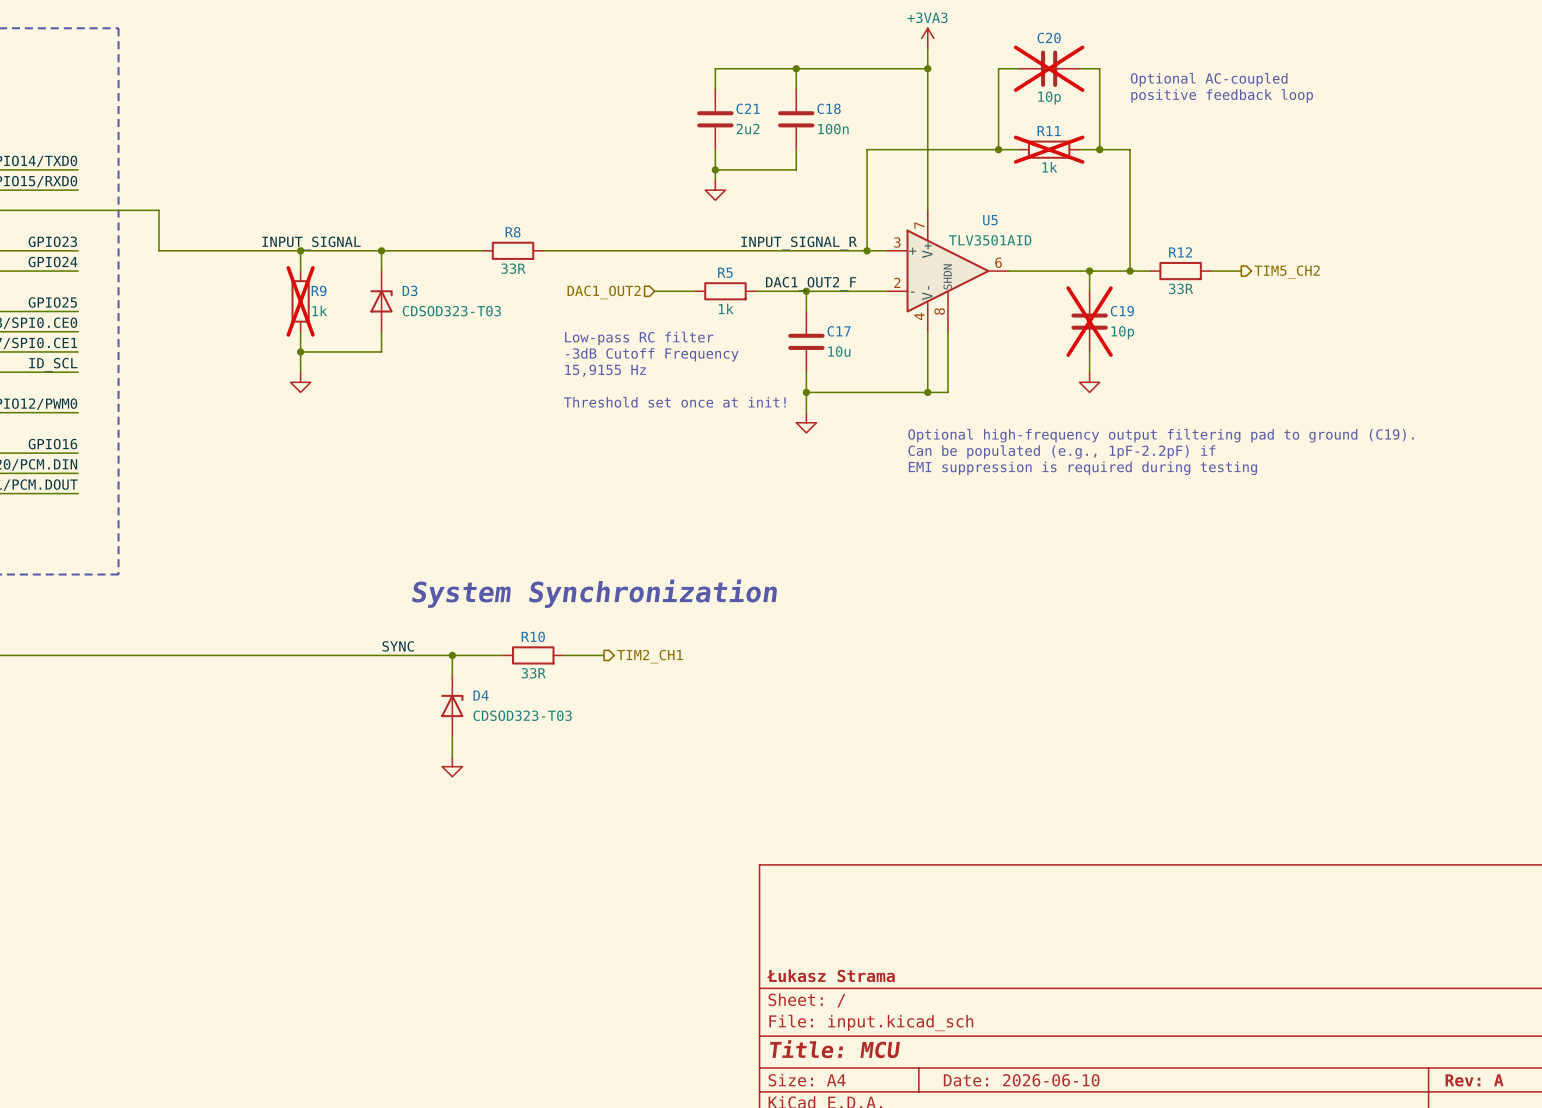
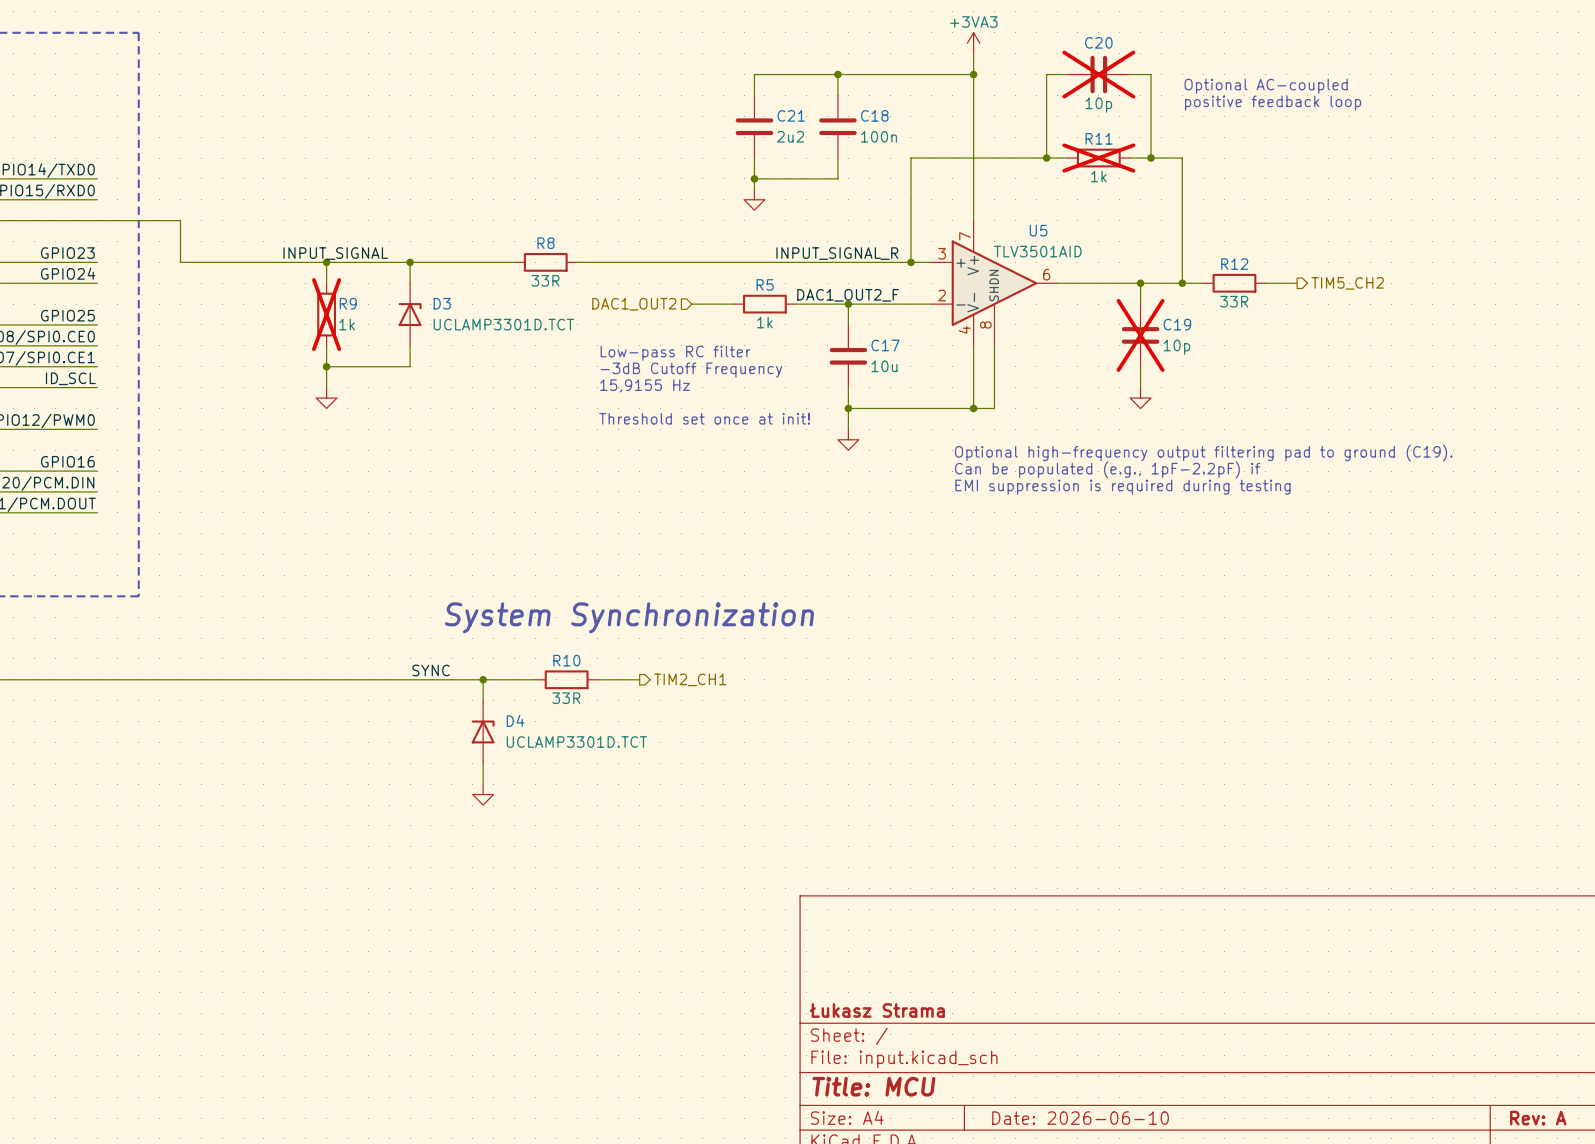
D3 value: CDSOD323-T03 (451, 311) -> UCLAMP3301D.TCT (503, 324)
D4 value: CDSOD323-T03 (522, 715) -> UCLAMP3301D.TCT (576, 742)

